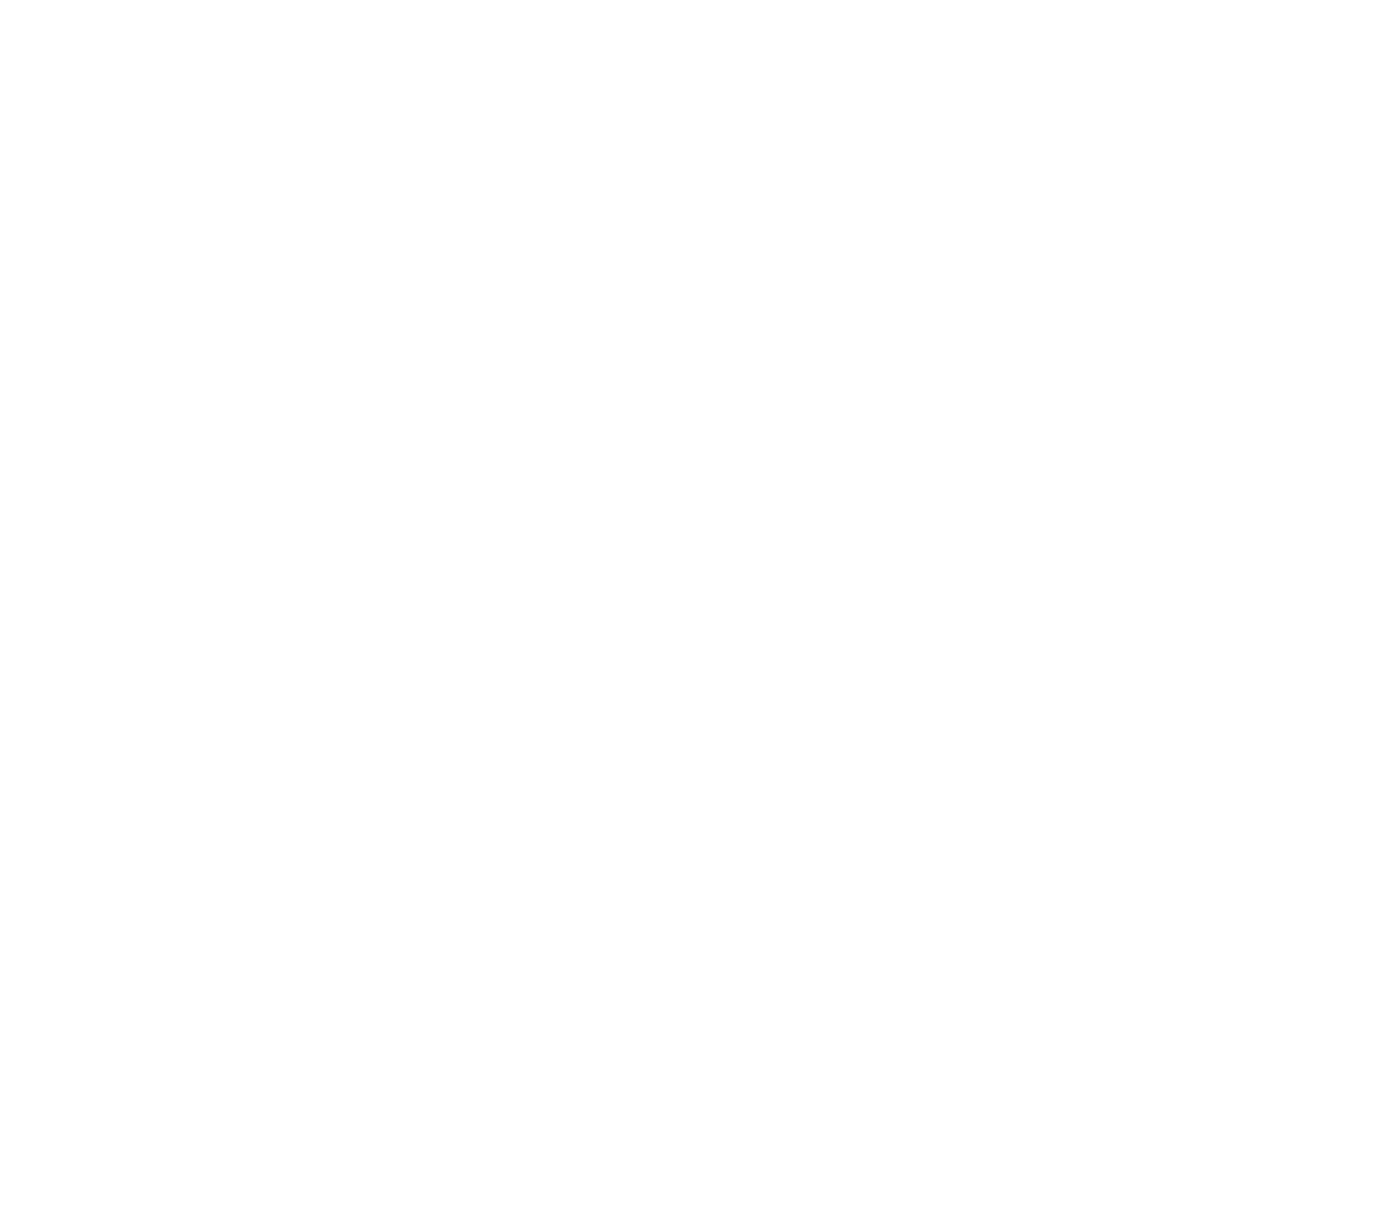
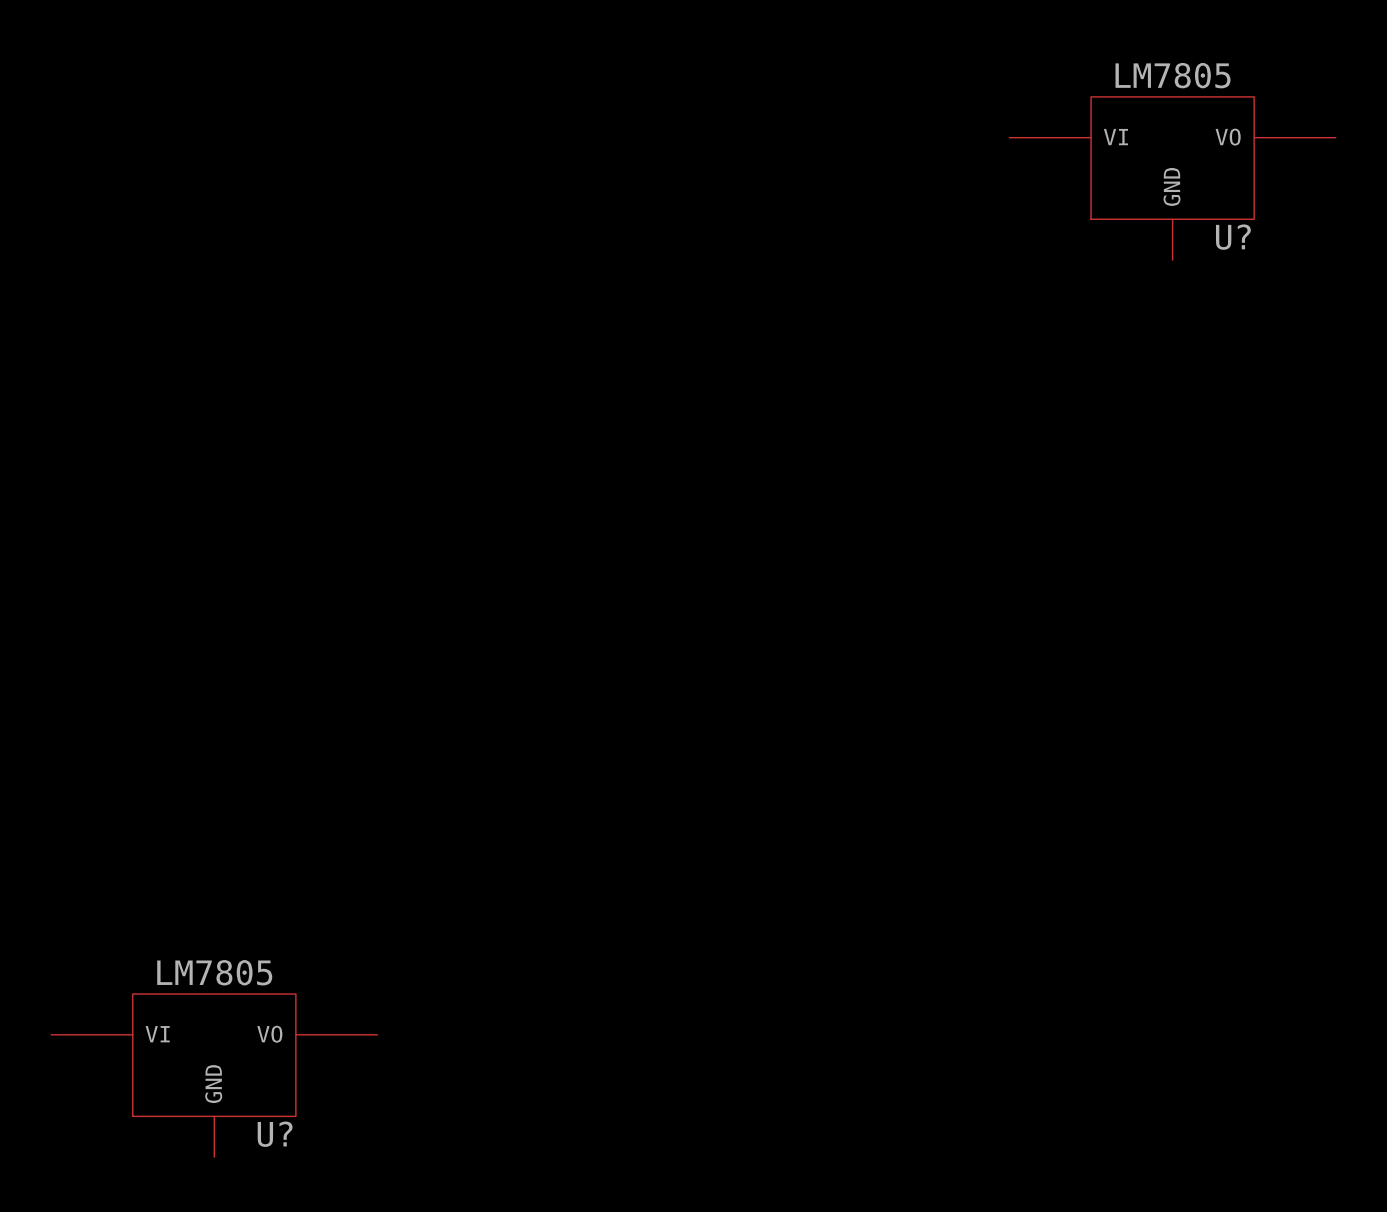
U?: none -> LM7805 (1172, 178)
U?: none -> LM7805 (214, 1075)

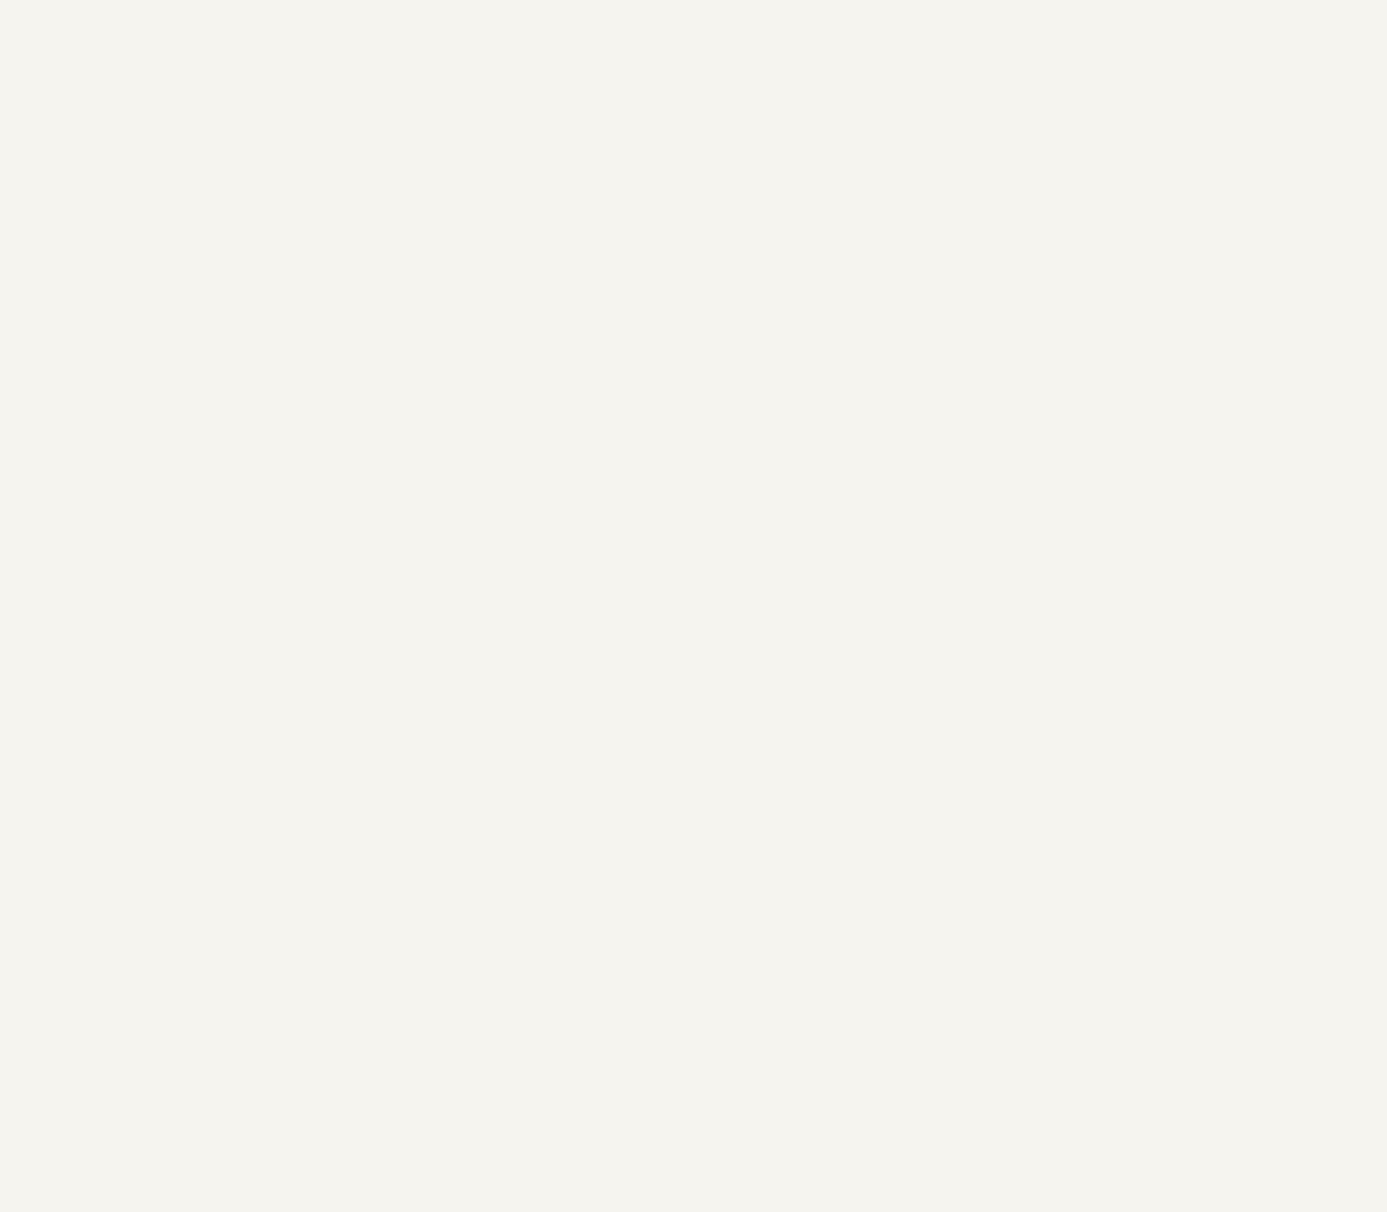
U?: LM7805 (1172, 178) -> none
U?: LM7805 (214, 1075) -> none

